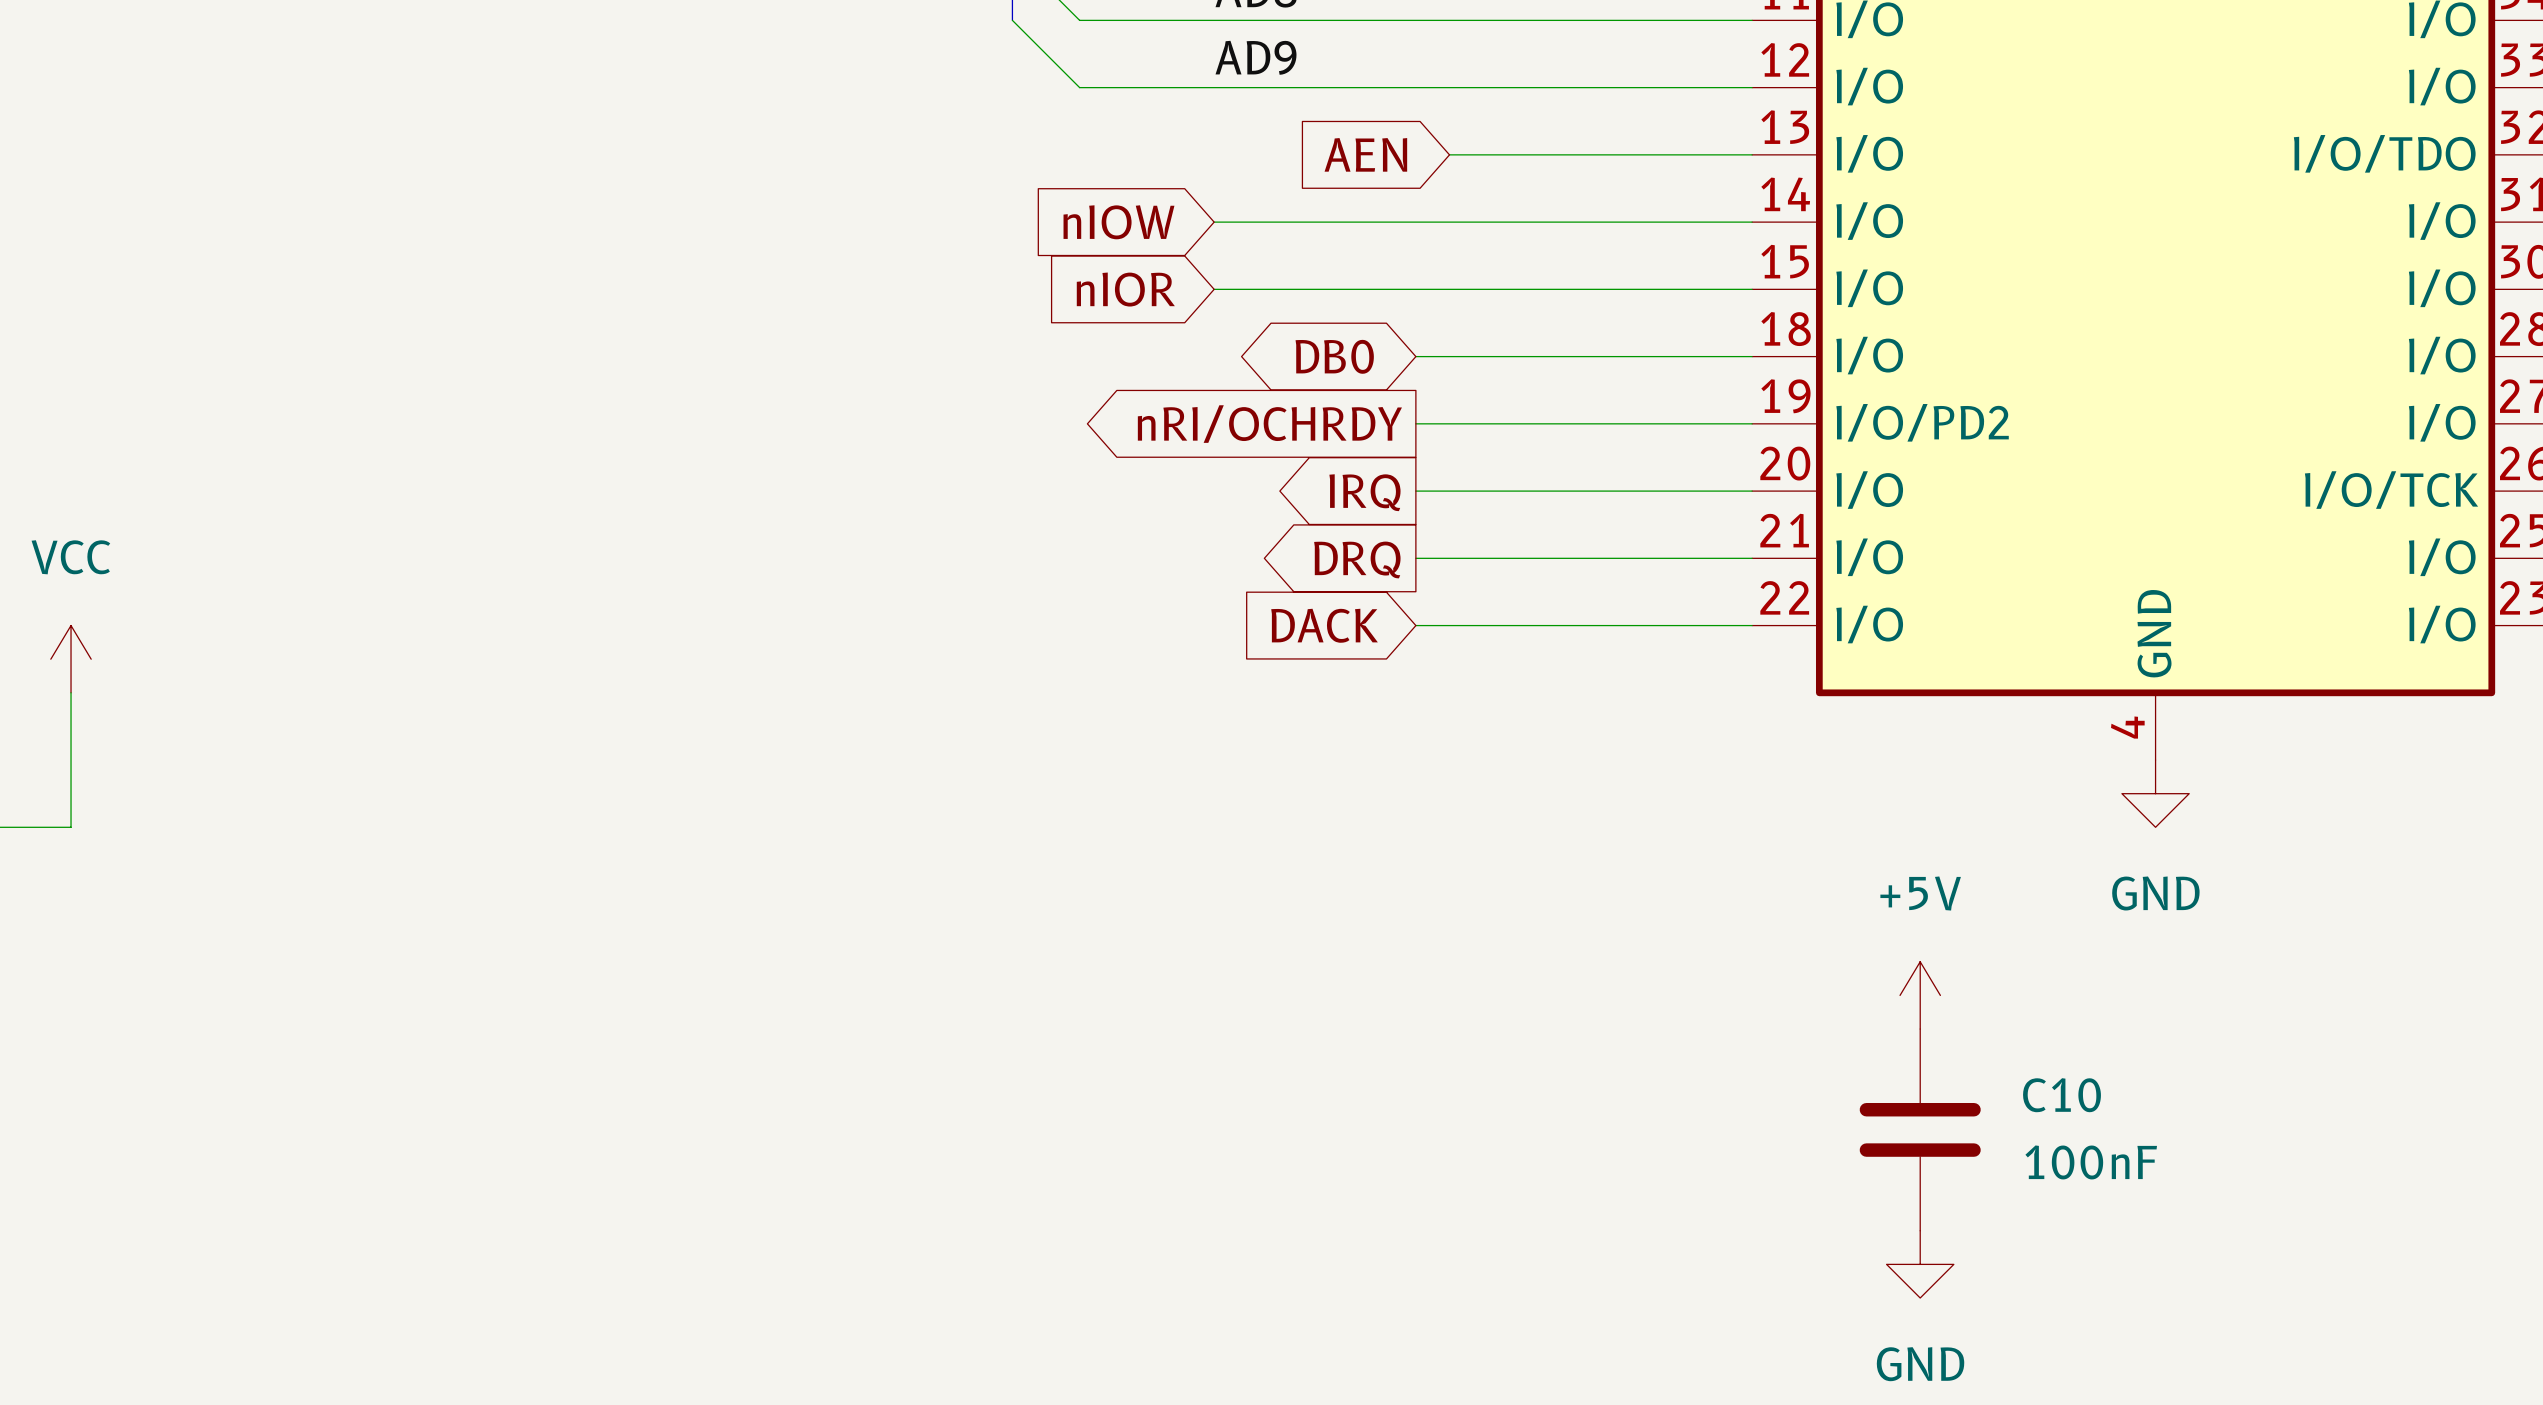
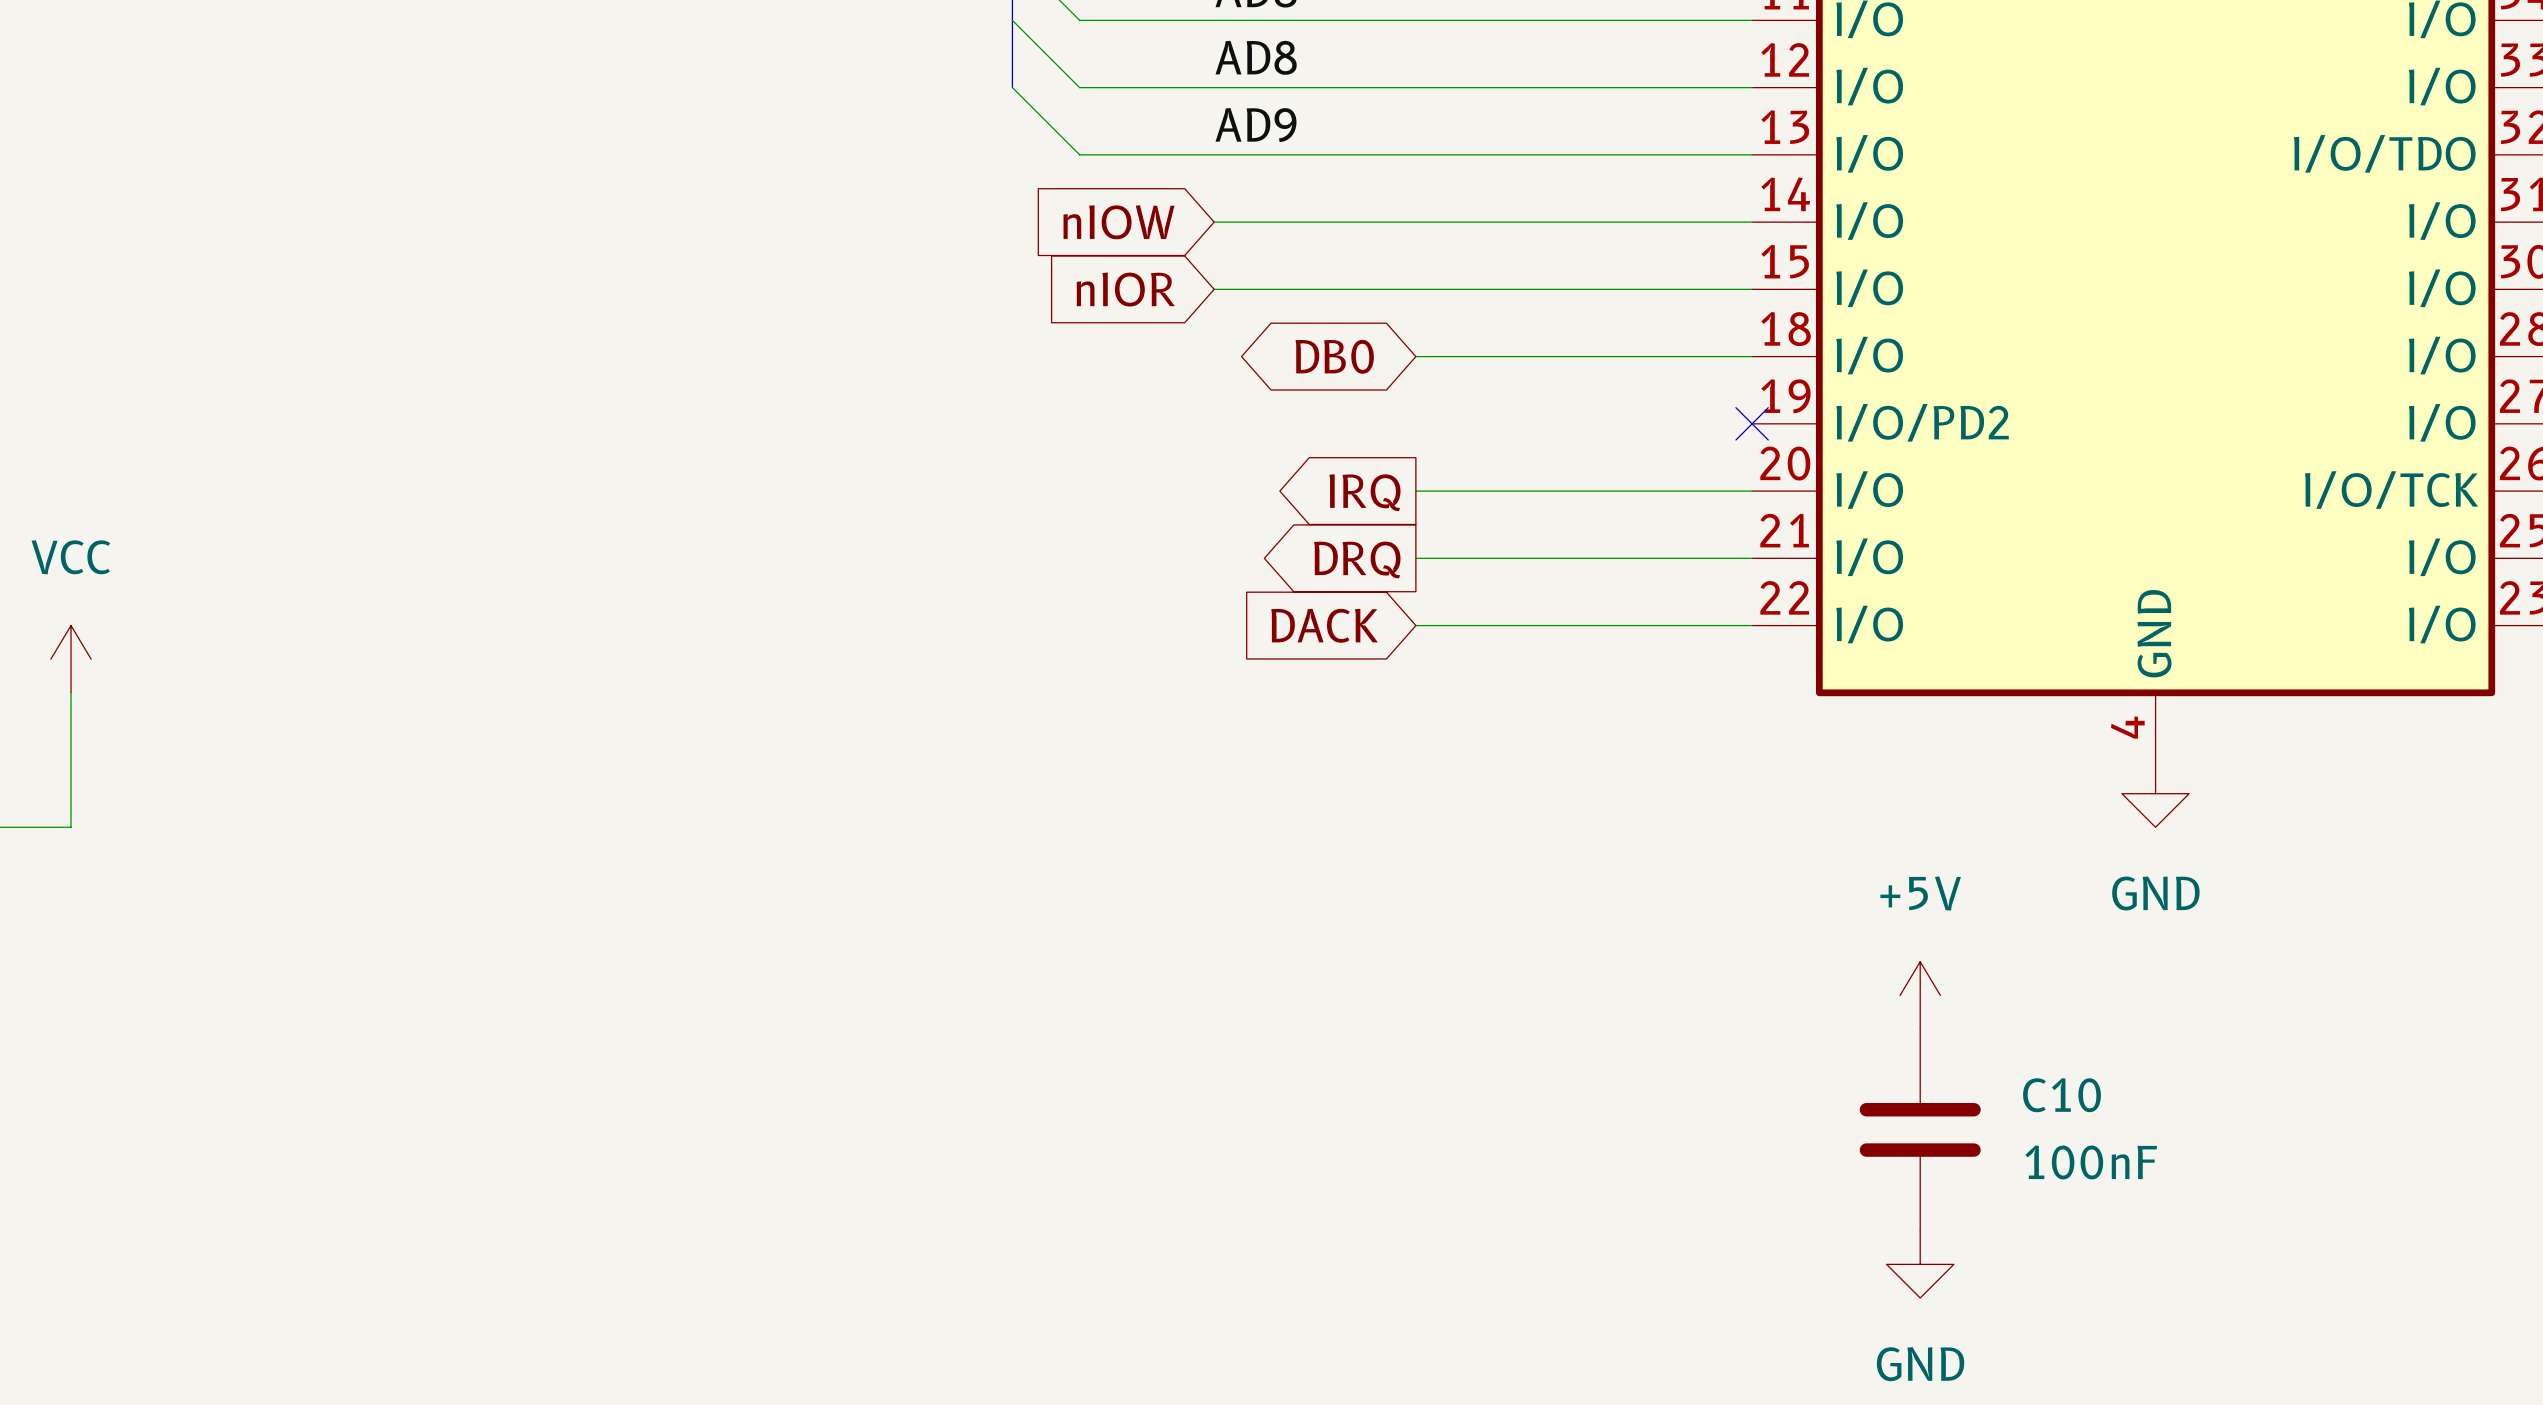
bus: none -> (1012, 20) (1012, 87)
label: AD9 (1256, 57) -> AD8 (1256, 57)
wire: none -> (1012, 87) (1079, 154) (1449, 154)
label: none -> AD9 (1256, 125)
global label: AEN (1365, 154) -> none
wire: (1415, 423) (1752, 423) -> none
no-connect mark: none -> (1752, 423)
global label: nRI/OCHRDY (1269, 424) -> none

